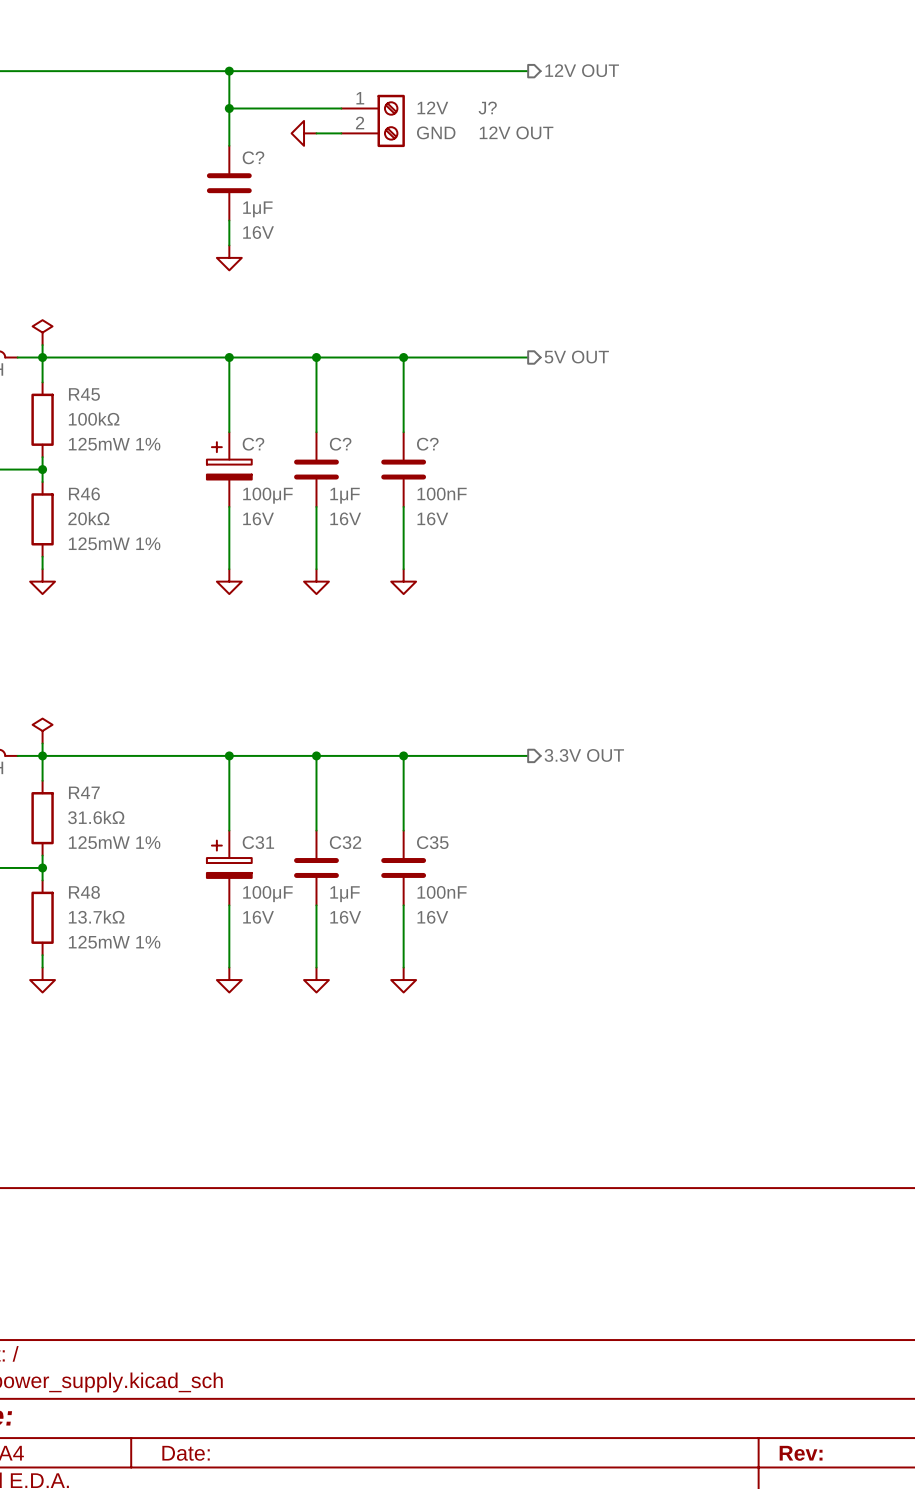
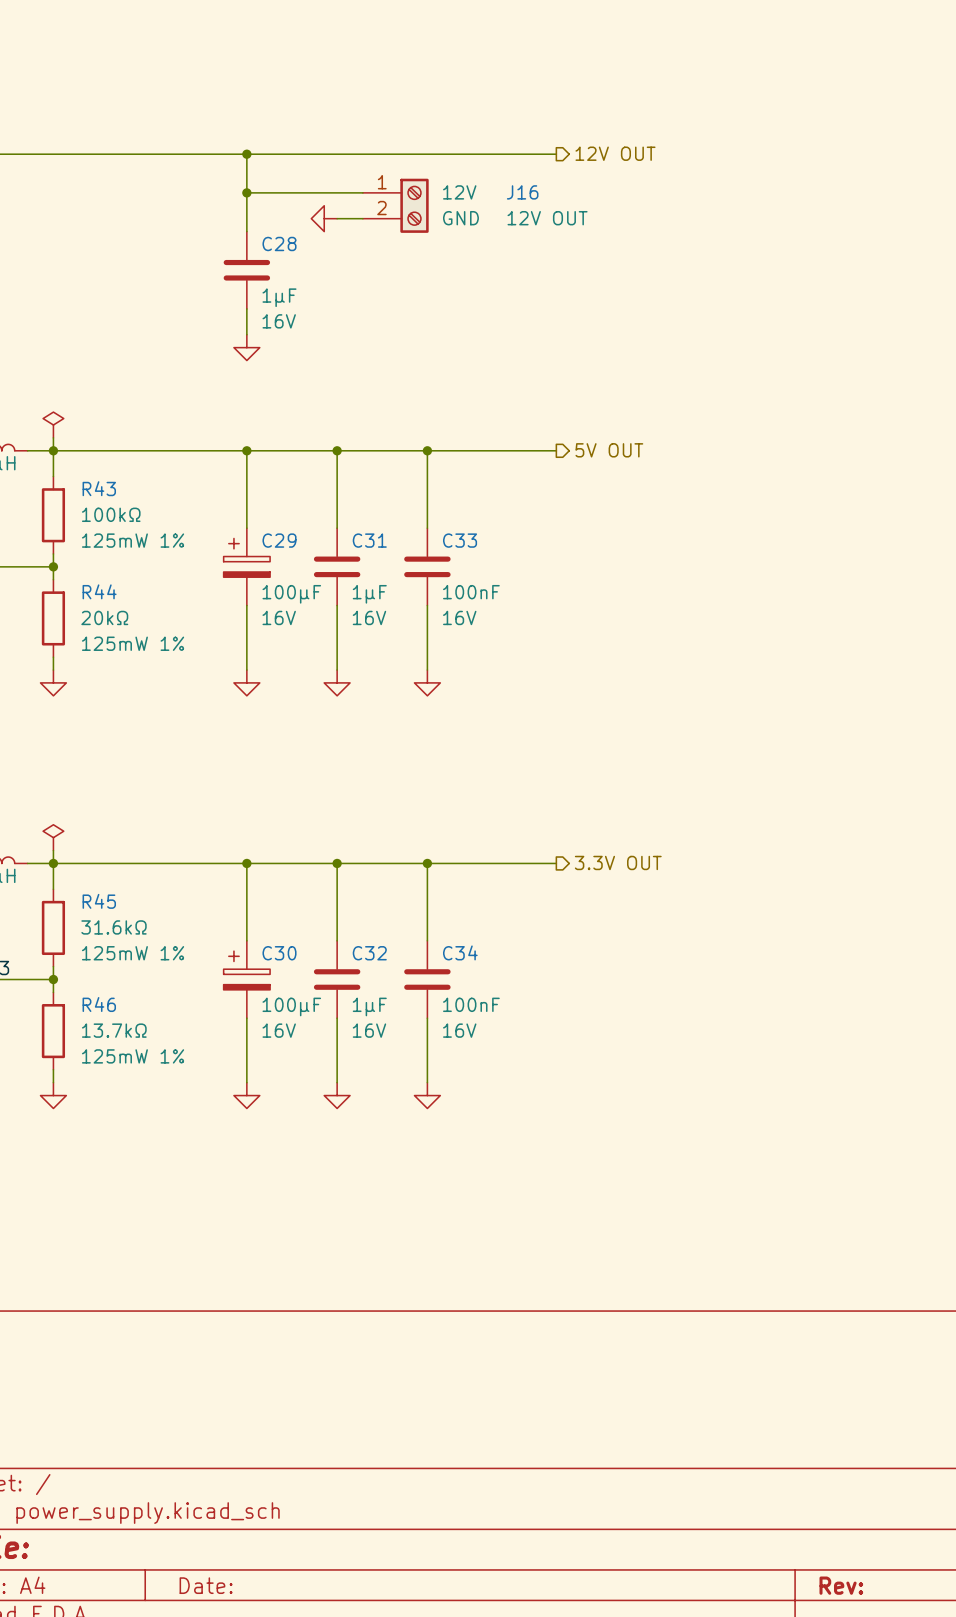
J? name: J? (487, 108) -> J16 (522, 192)
C? name: C? (253, 157) -> C28 (279, 243)
R45 name: R45 (84, 394) -> R43 (99, 488)
C? name: C? (253, 444) -> C29 (279, 540)
C? name: C? (340, 444) -> C31 (369, 540)
C? name: C? (427, 444) -> C33 (460, 540)
R46 name: R46 (84, 493) -> R44 (99, 591)
R47 name: R47 (84, 792) -> R45 (99, 901)
C31 name: C31 (258, 842) -> C30 (279, 953)
C35 name: C35 (432, 842) -> C34 (460, 952)
R48 name: R48 (84, 892) -> R46 (99, 1004)

